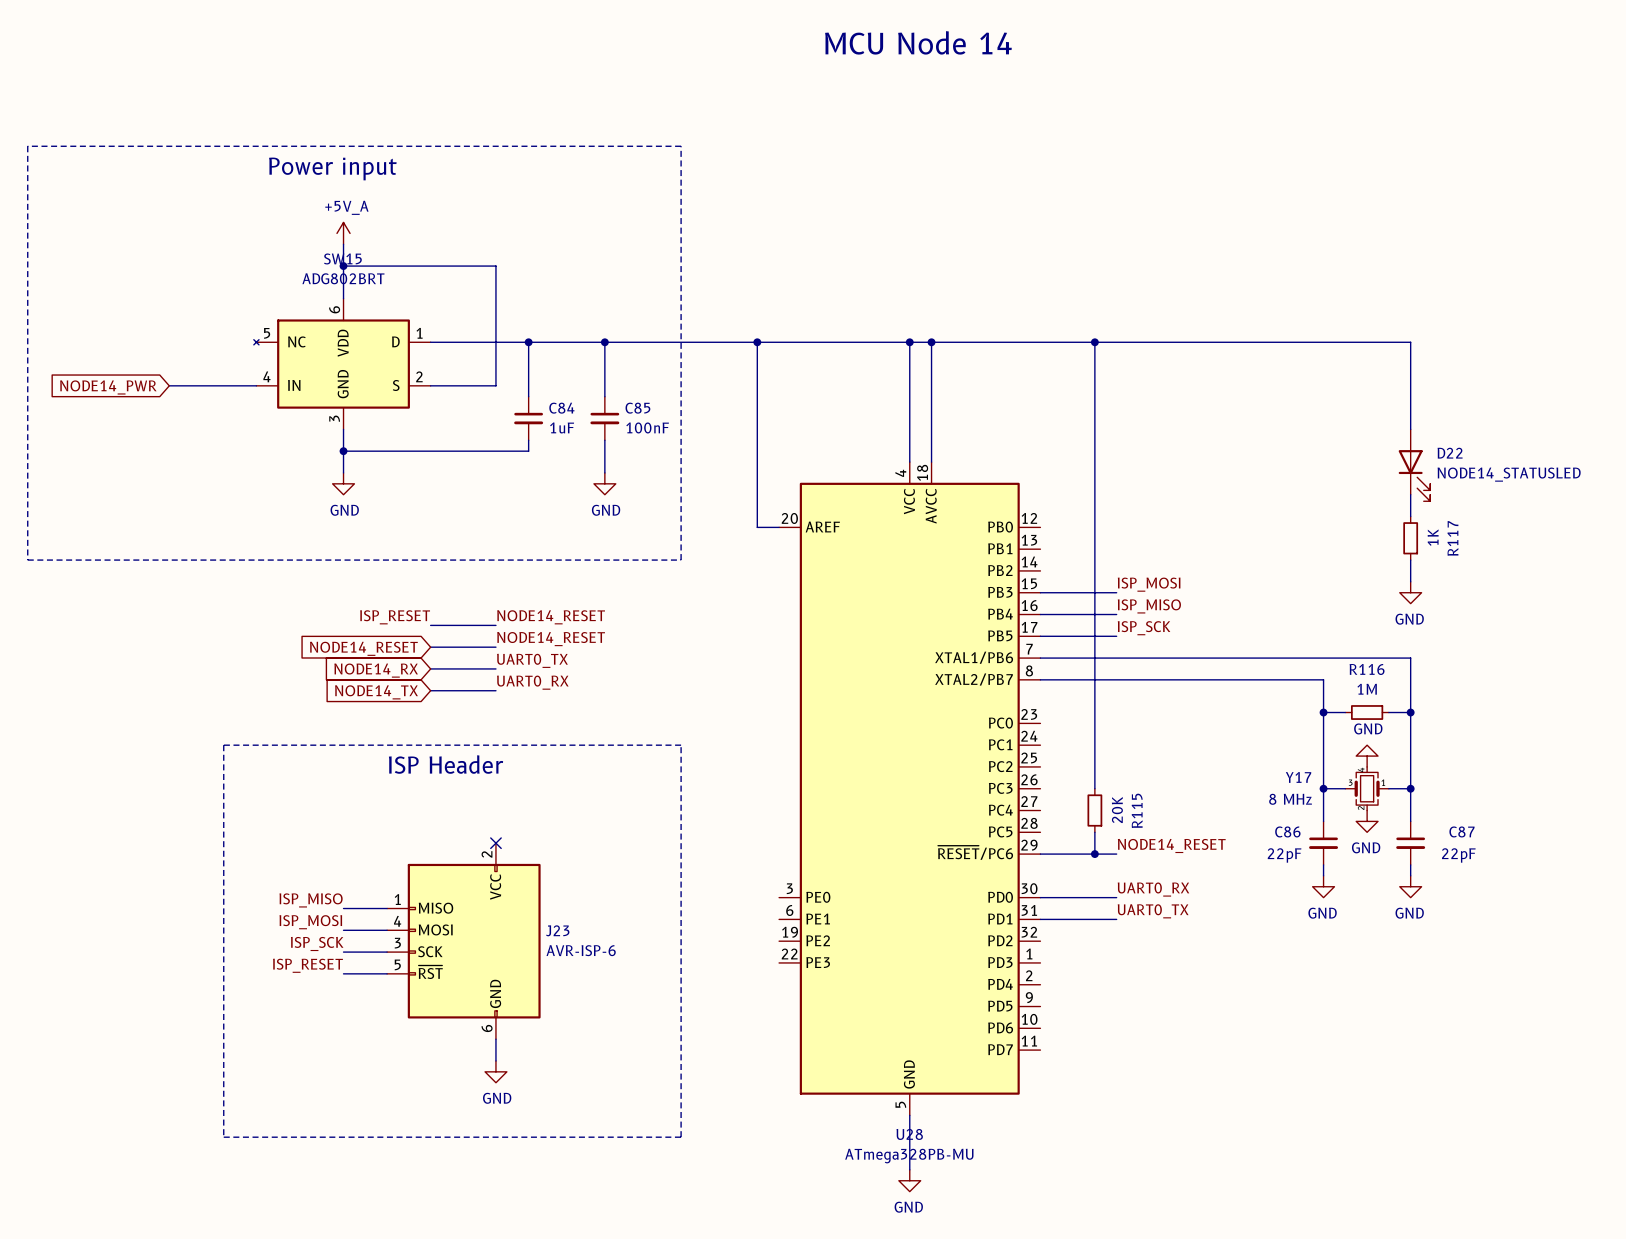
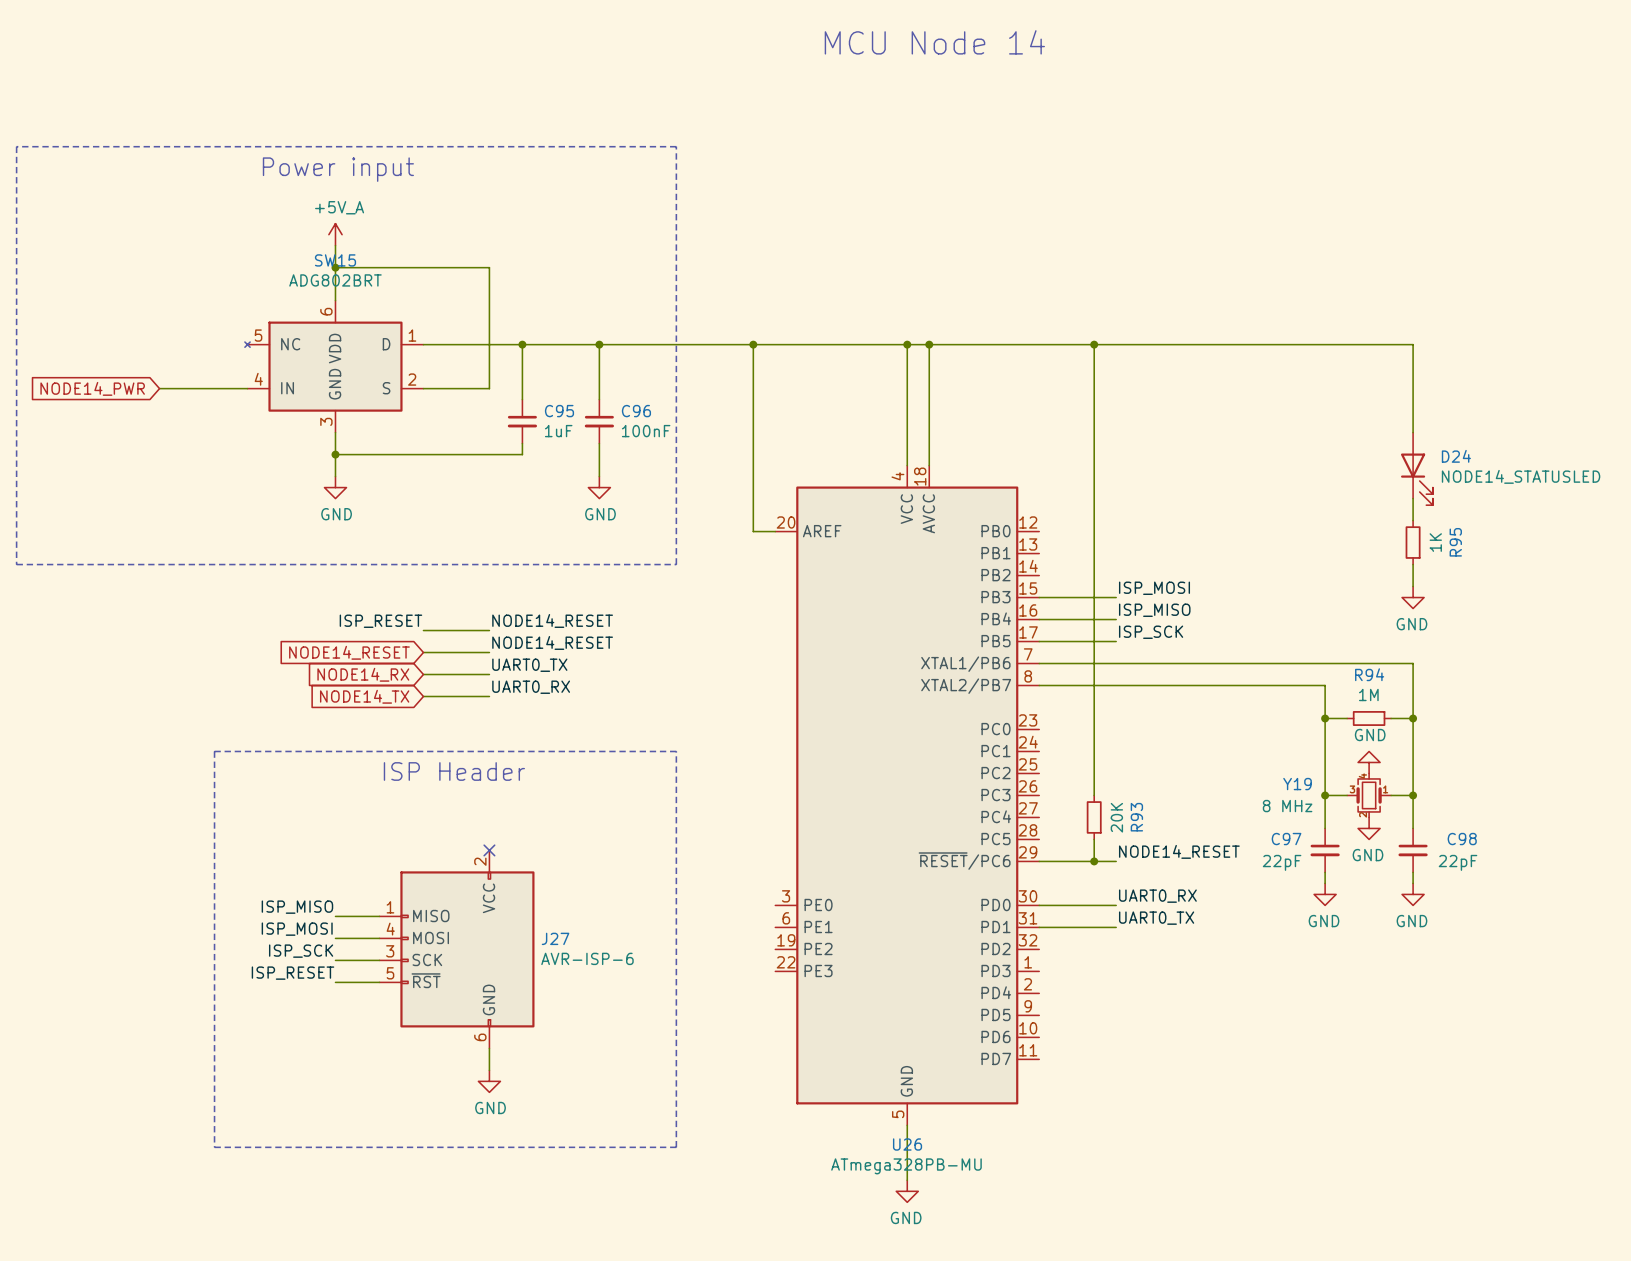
C84 name: C84 (561, 408) -> C95 (559, 411)
C85 name: C85 (637, 408) -> C96 (636, 411)
D22 name: D22 (1450, 453) -> D24 (1456, 456)
R117 name: R117 (1452, 538) -> R95 (1455, 542)
R116 name: R116 (1367, 669) -> R94 (1369, 674)
Y17 name: Y17 (1298, 777) -> Y19 (1297, 784)
R115 name: R115 (1137, 810) -> R93 (1136, 817)
C86 name: C86 (1287, 831) -> C97 (1286, 839)
C87 name: C87 (1461, 831) -> C98 (1462, 839)
J23 name: J23 (557, 930) -> J27 (555, 938)
U28 name: U28 (909, 1134) -> U26 (907, 1144)

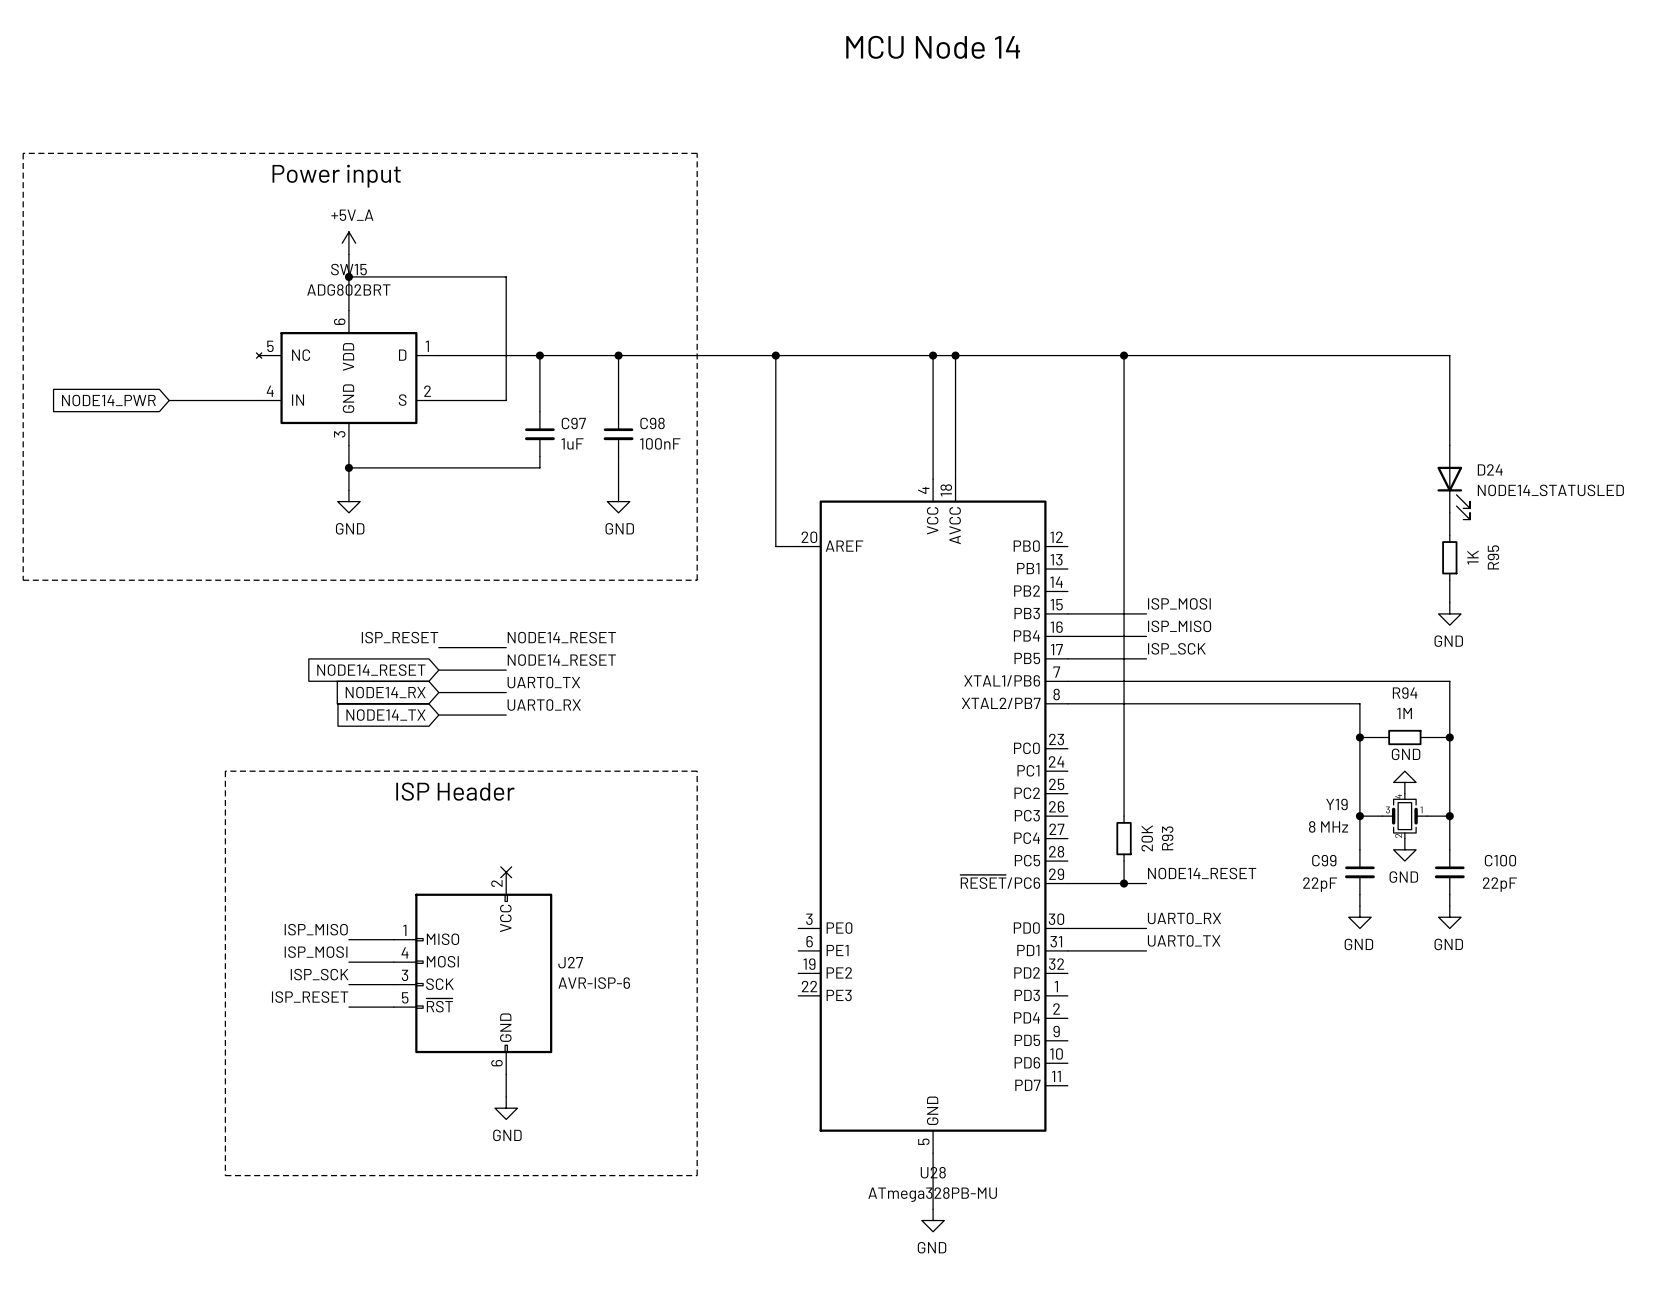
C95 name: C95 (559, 411) -> C97 (573, 423)
C96 name: C96 (636, 411) -> C98 (652, 423)
C97 name: C97 (1286, 839) -> C99 (1324, 860)
C98 name: C98 (1462, 839) -> C100 (1500, 860)
U26 name: U26 (907, 1144) -> U28 (933, 1172)

